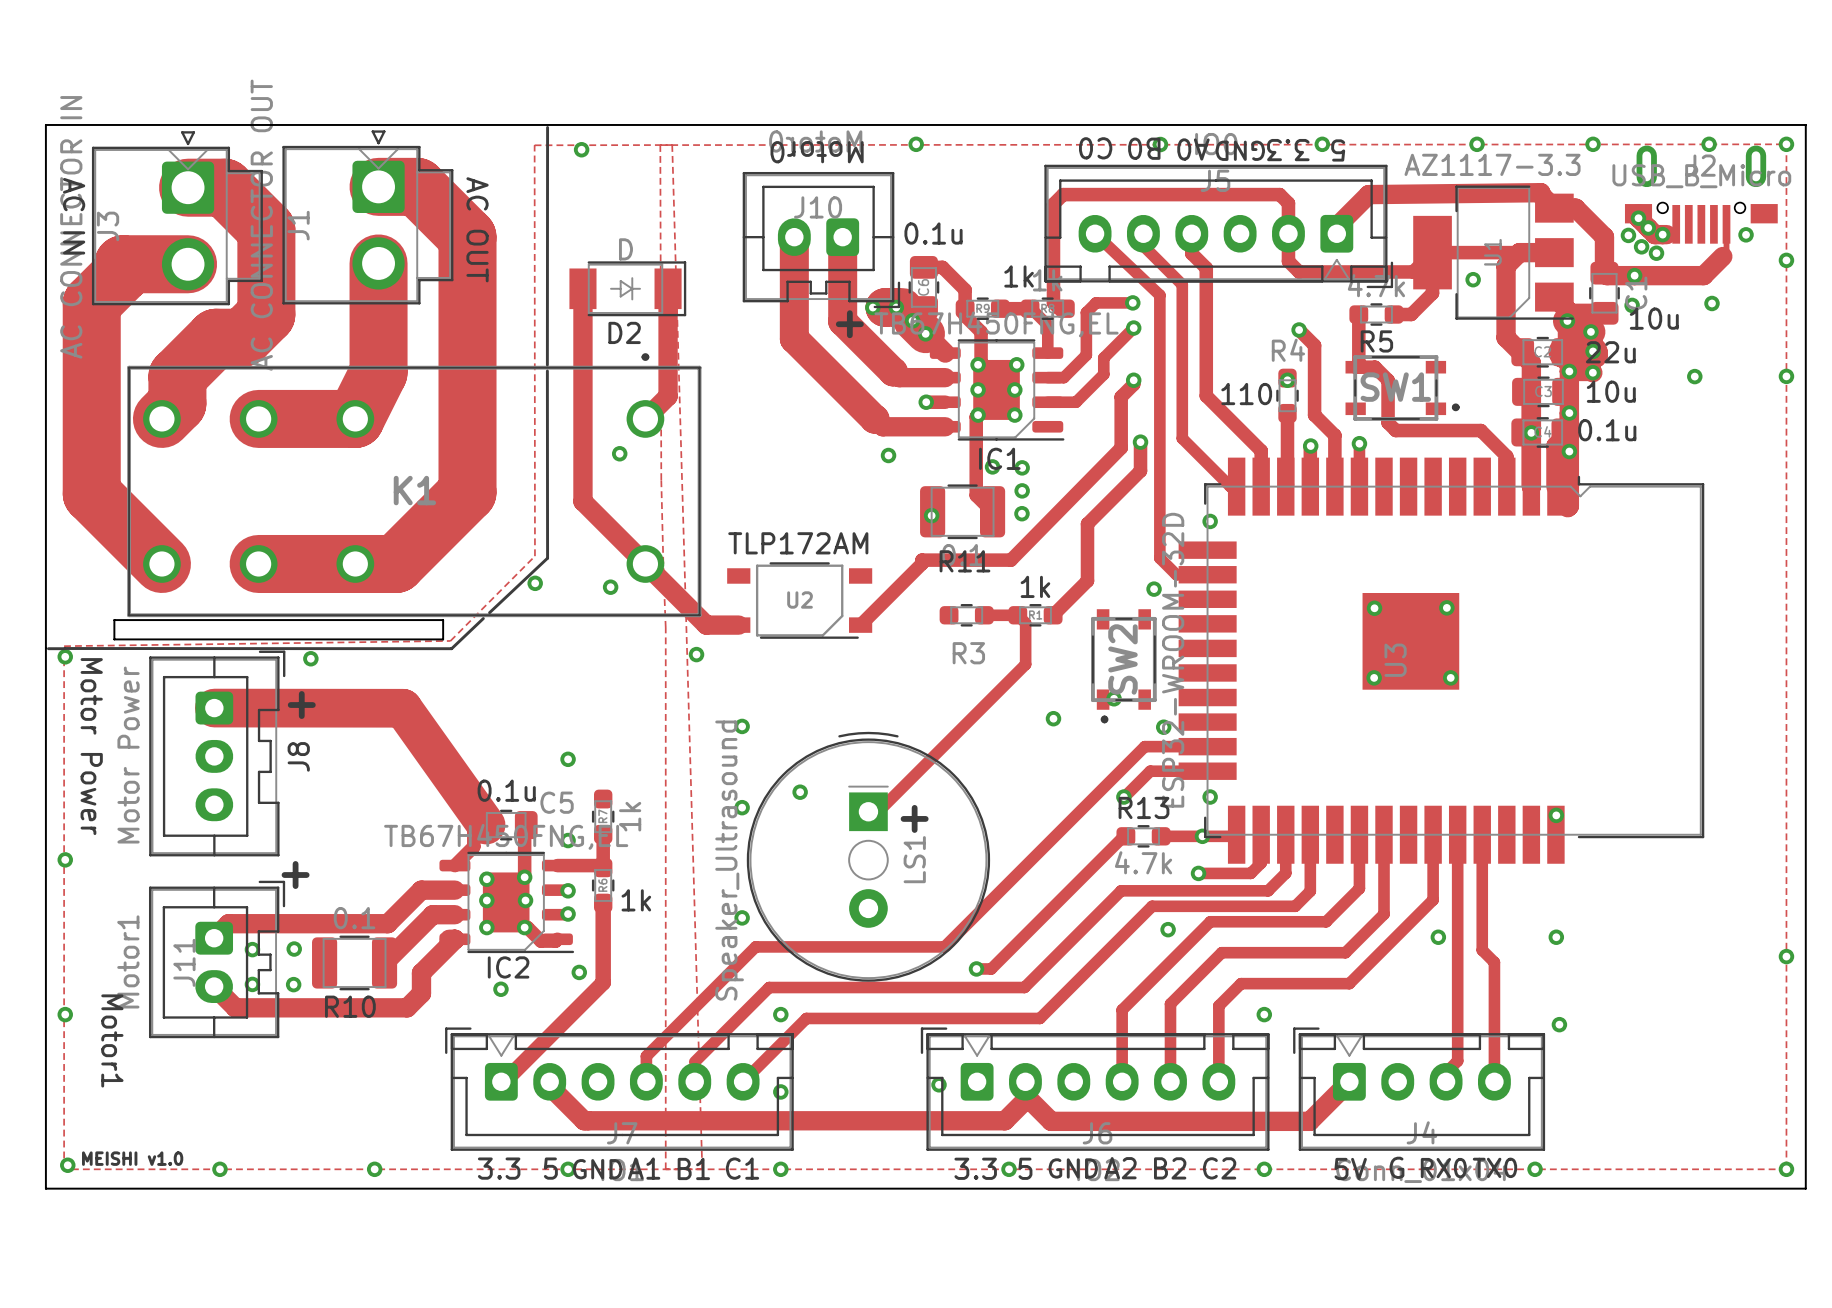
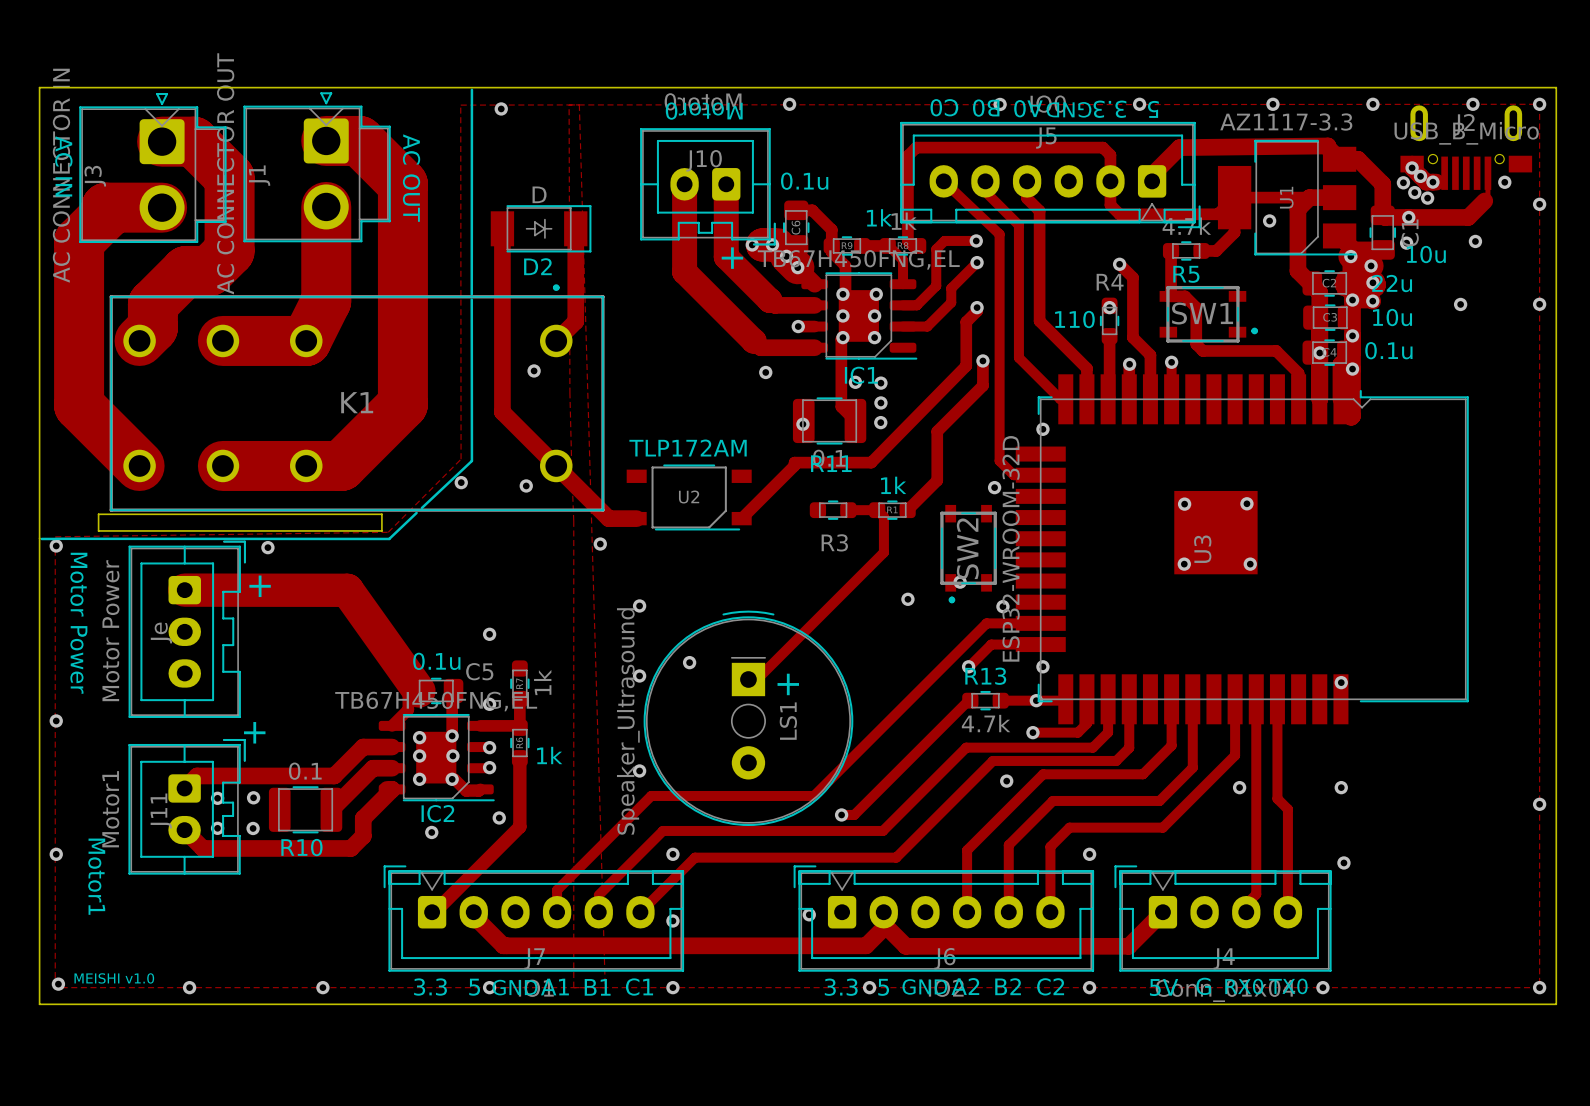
J8 name: J8 (298, 756) -> Je (161, 633)

